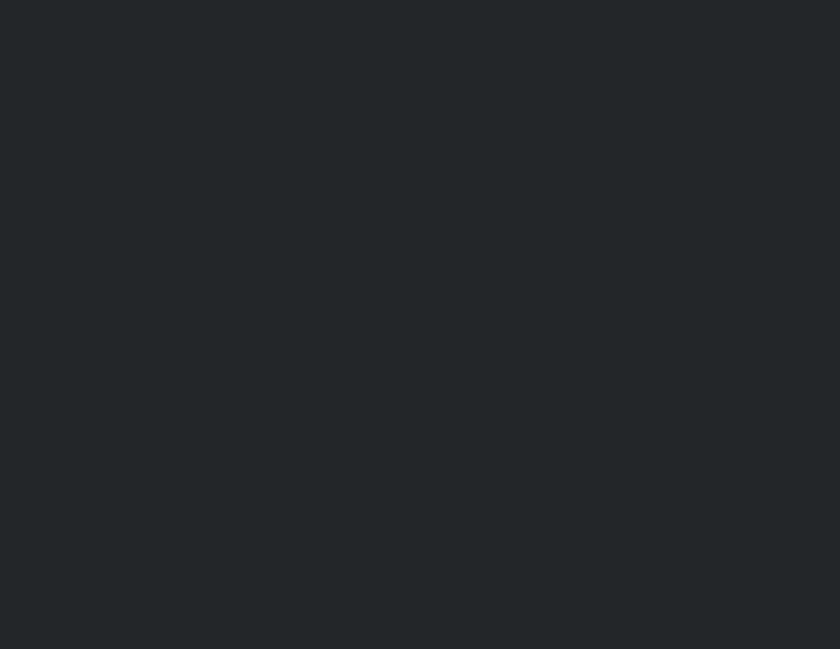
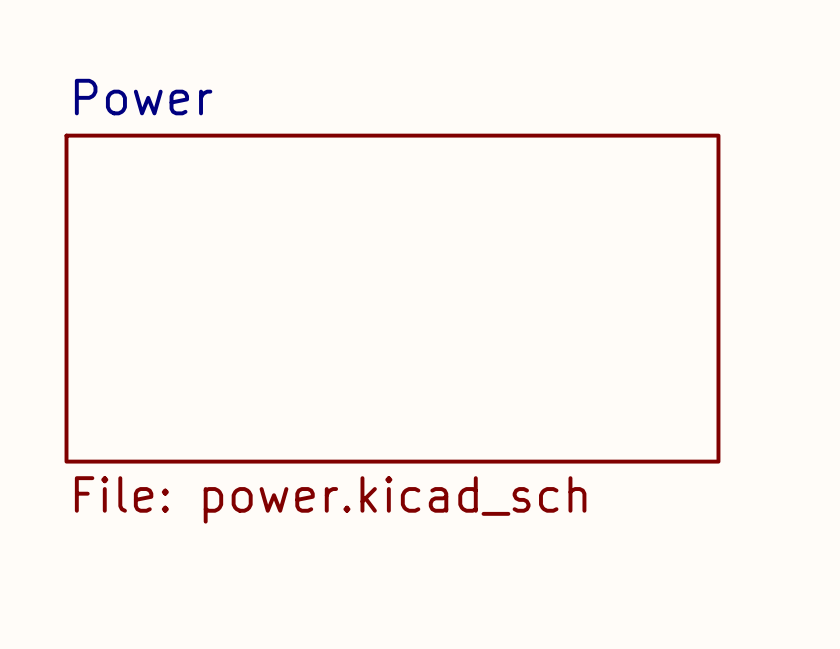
sheet Power: none -> File: power.kicad_sch (392, 298)

